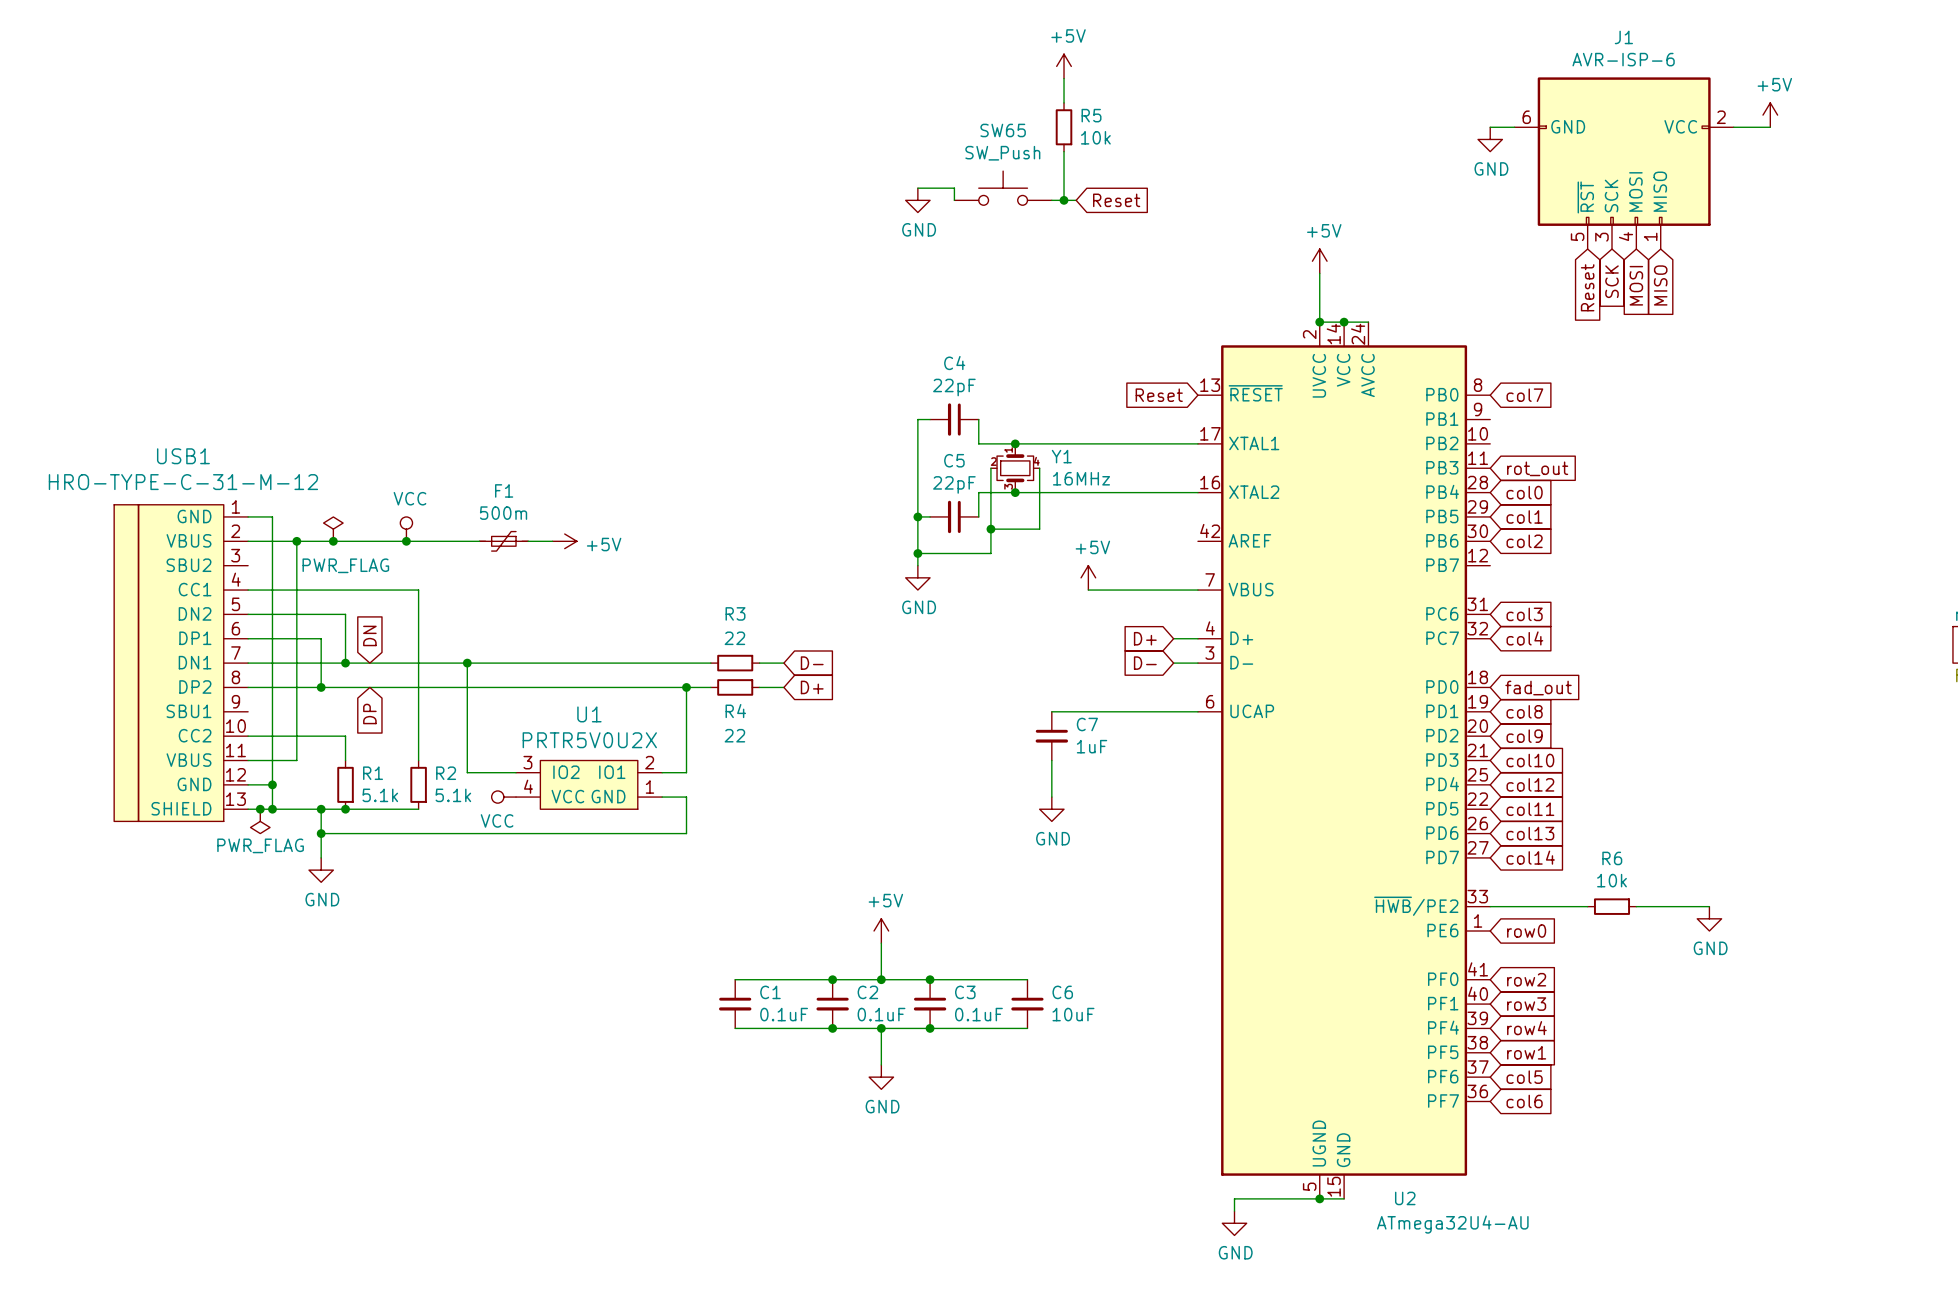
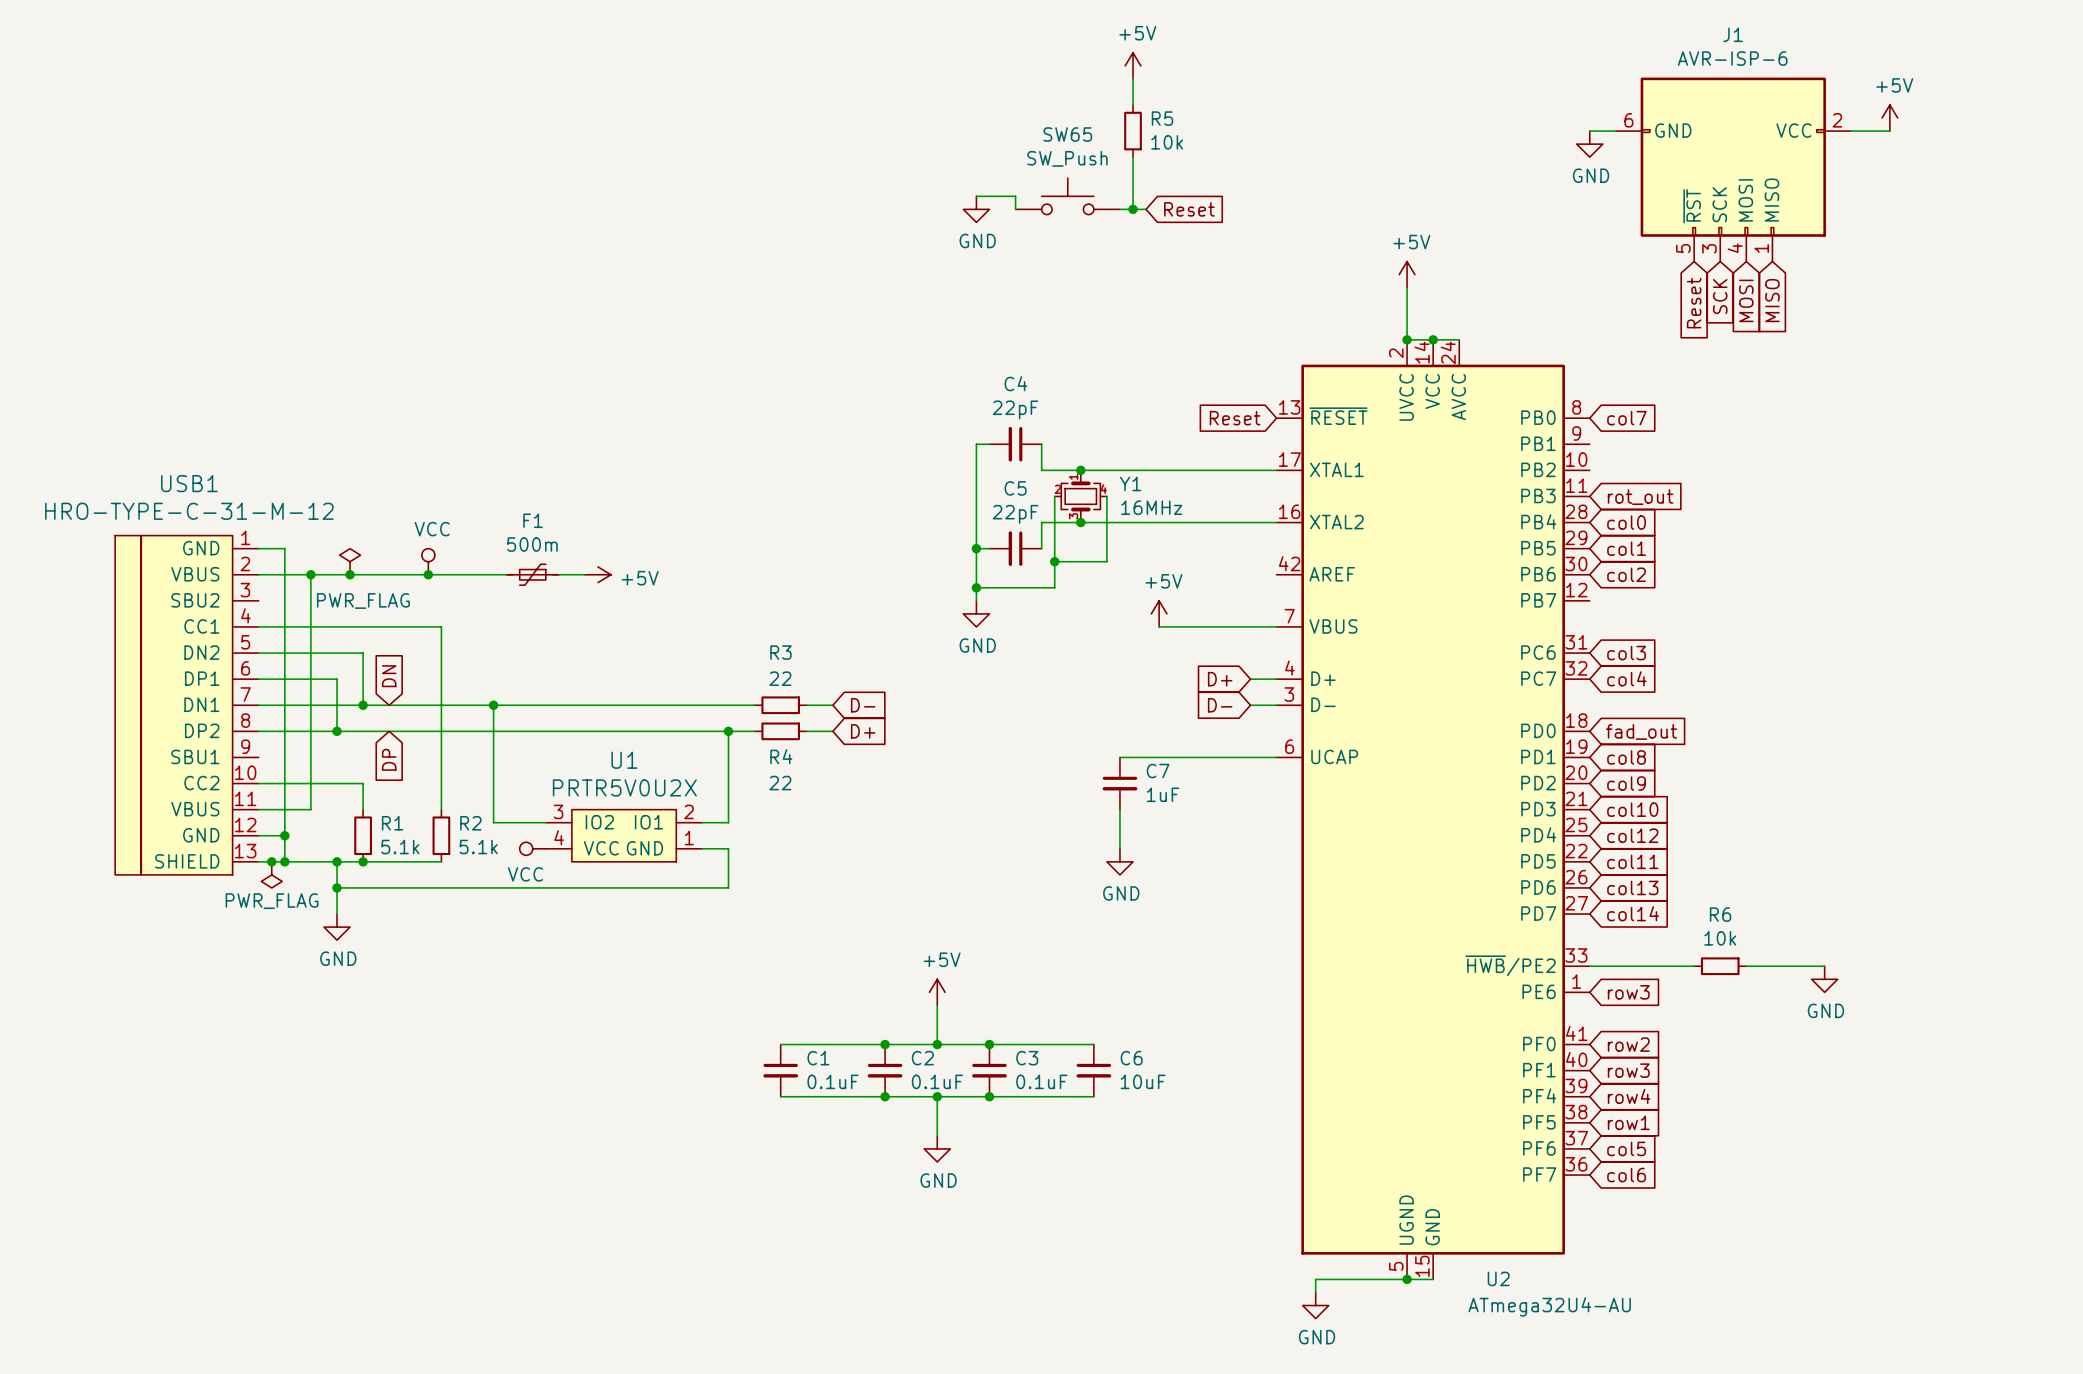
global label: row0 (1526, 931) -> row3 (1628, 992)

